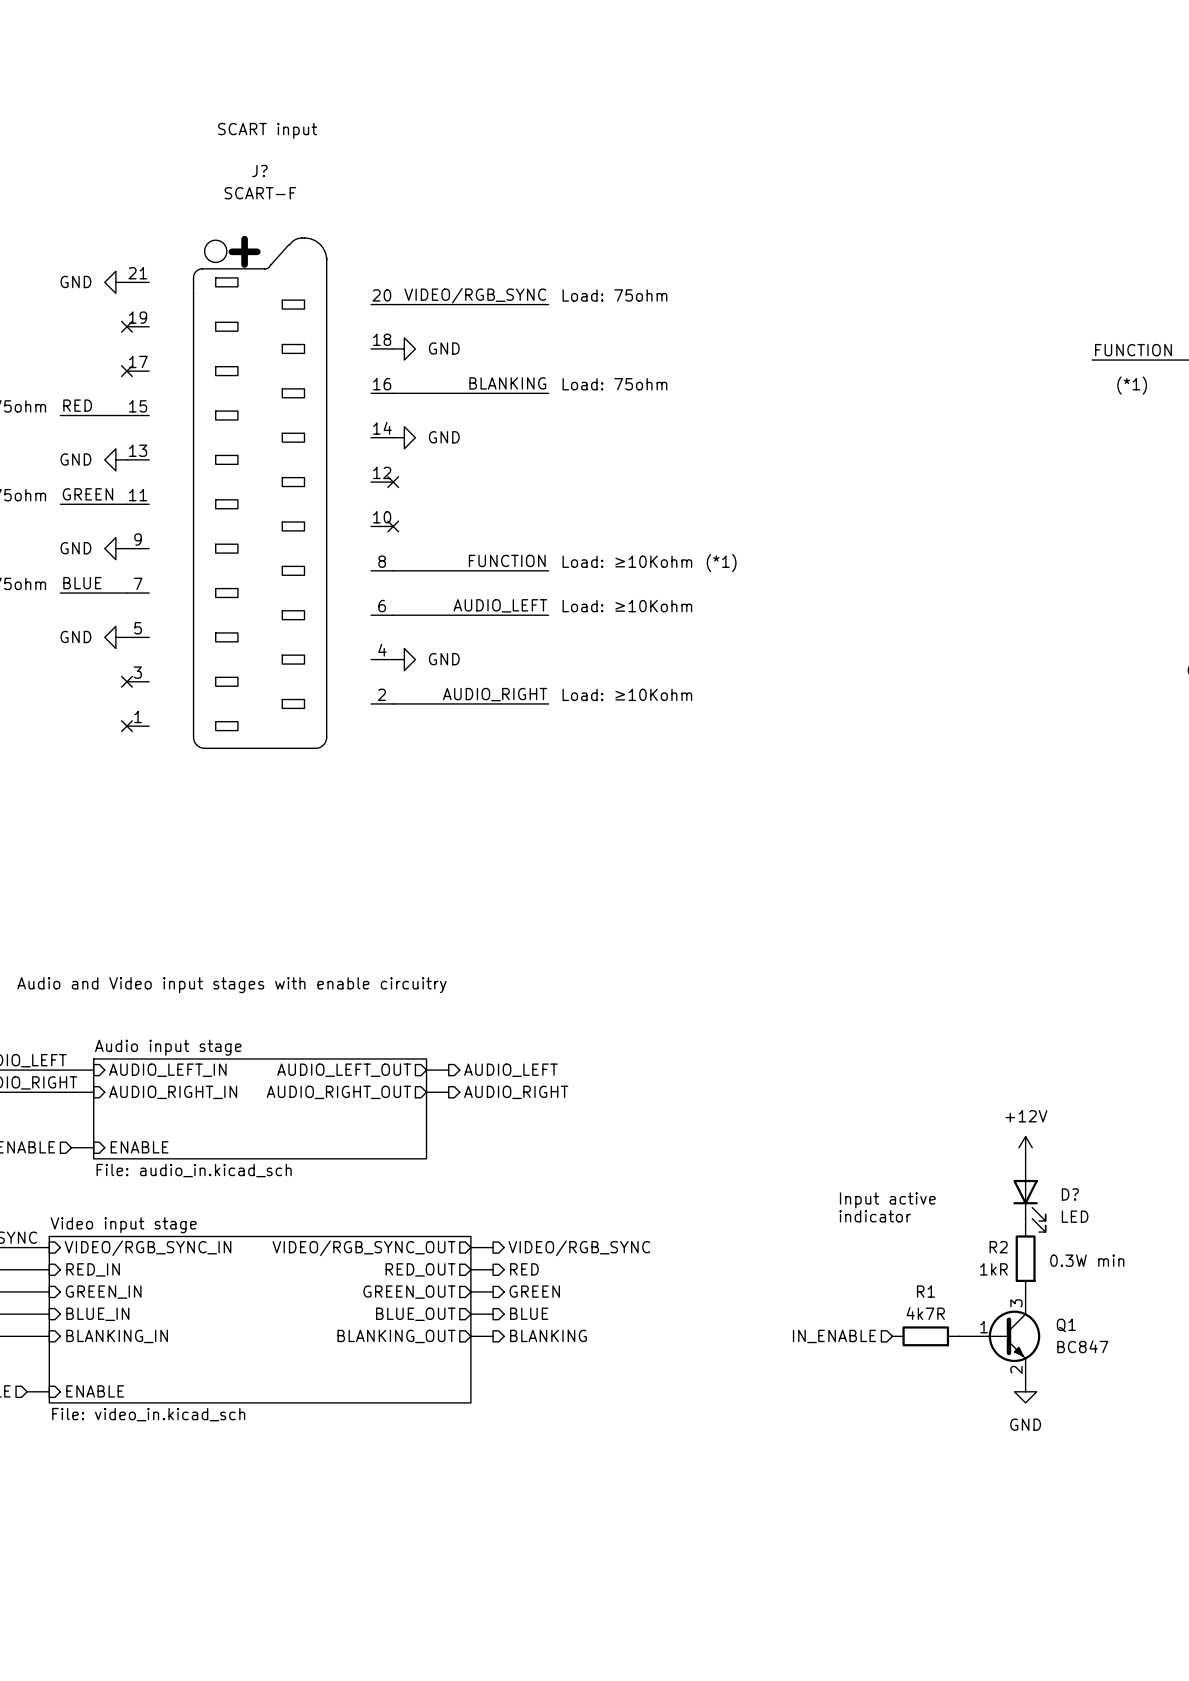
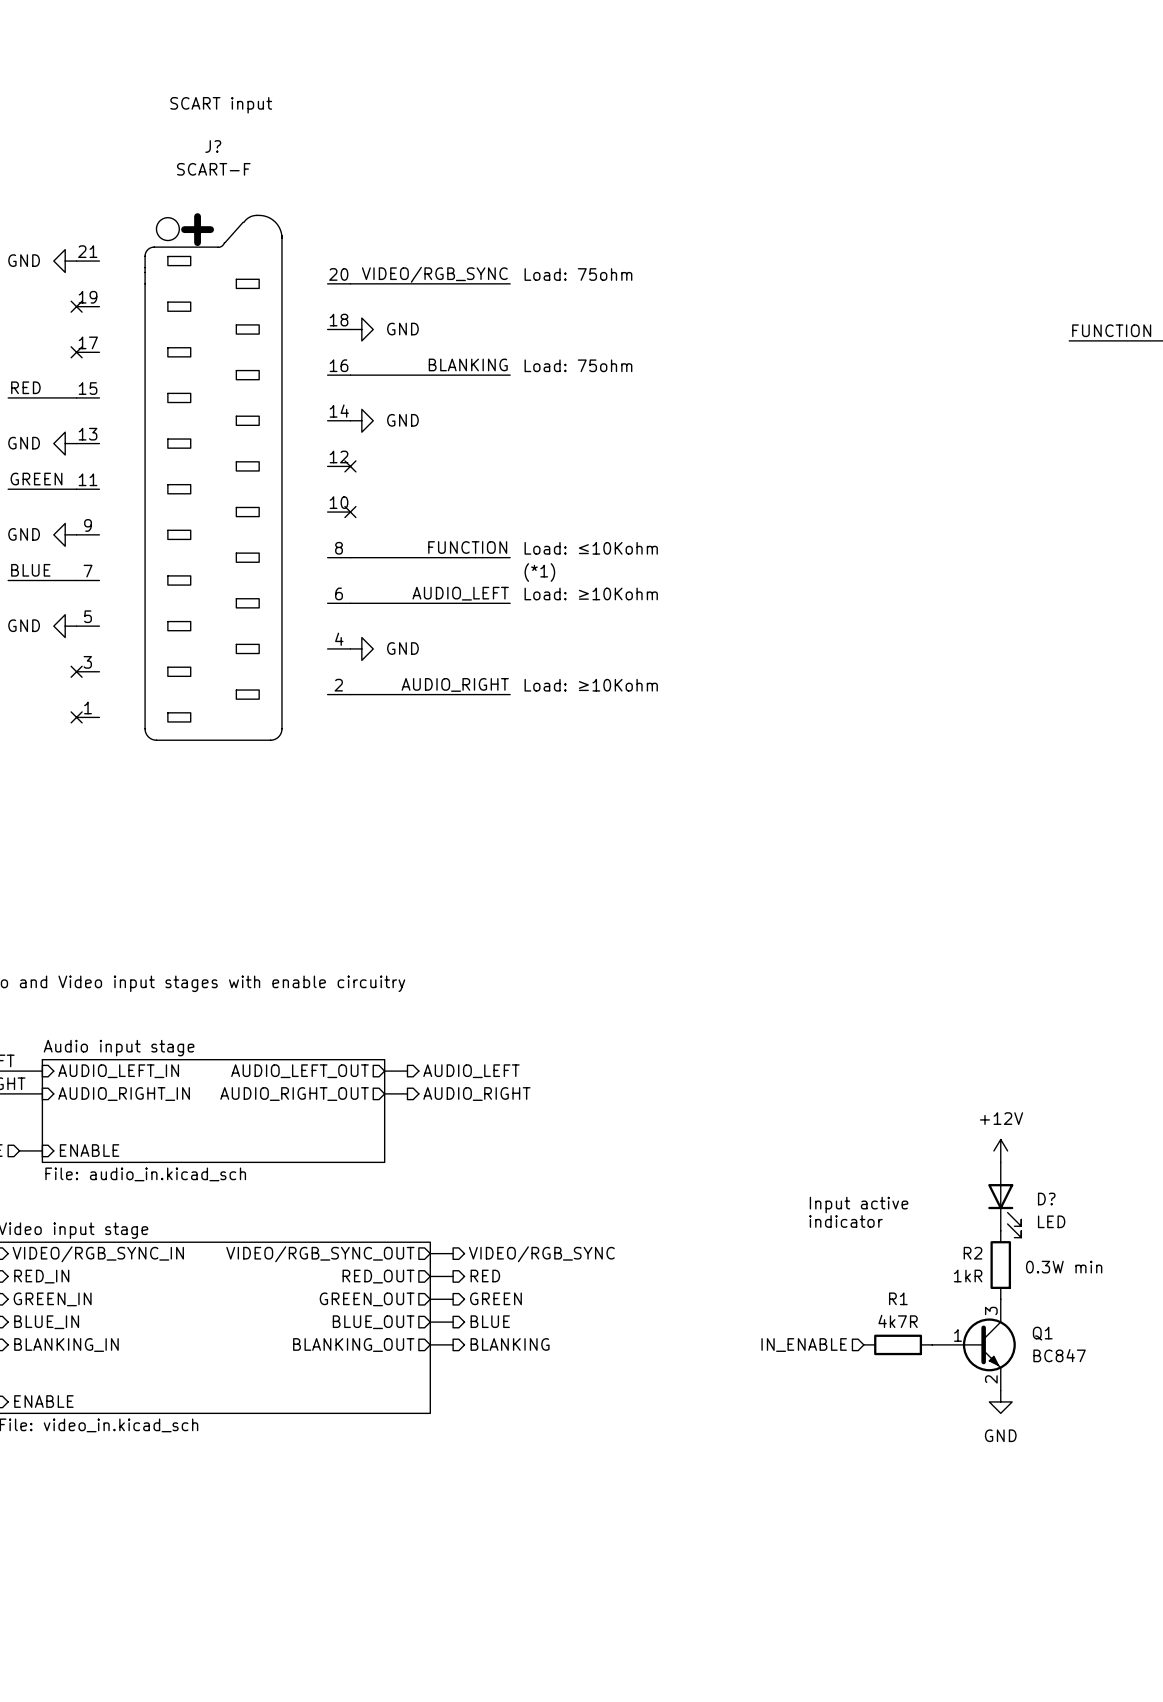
text: (*1) (1132, 385) -> none
text: Load: ≥10Kohm (627, 561) -> Load: ≤10Kohm (591, 548)
text position: (*1) (721, 563) -> (*1) (539, 572)

